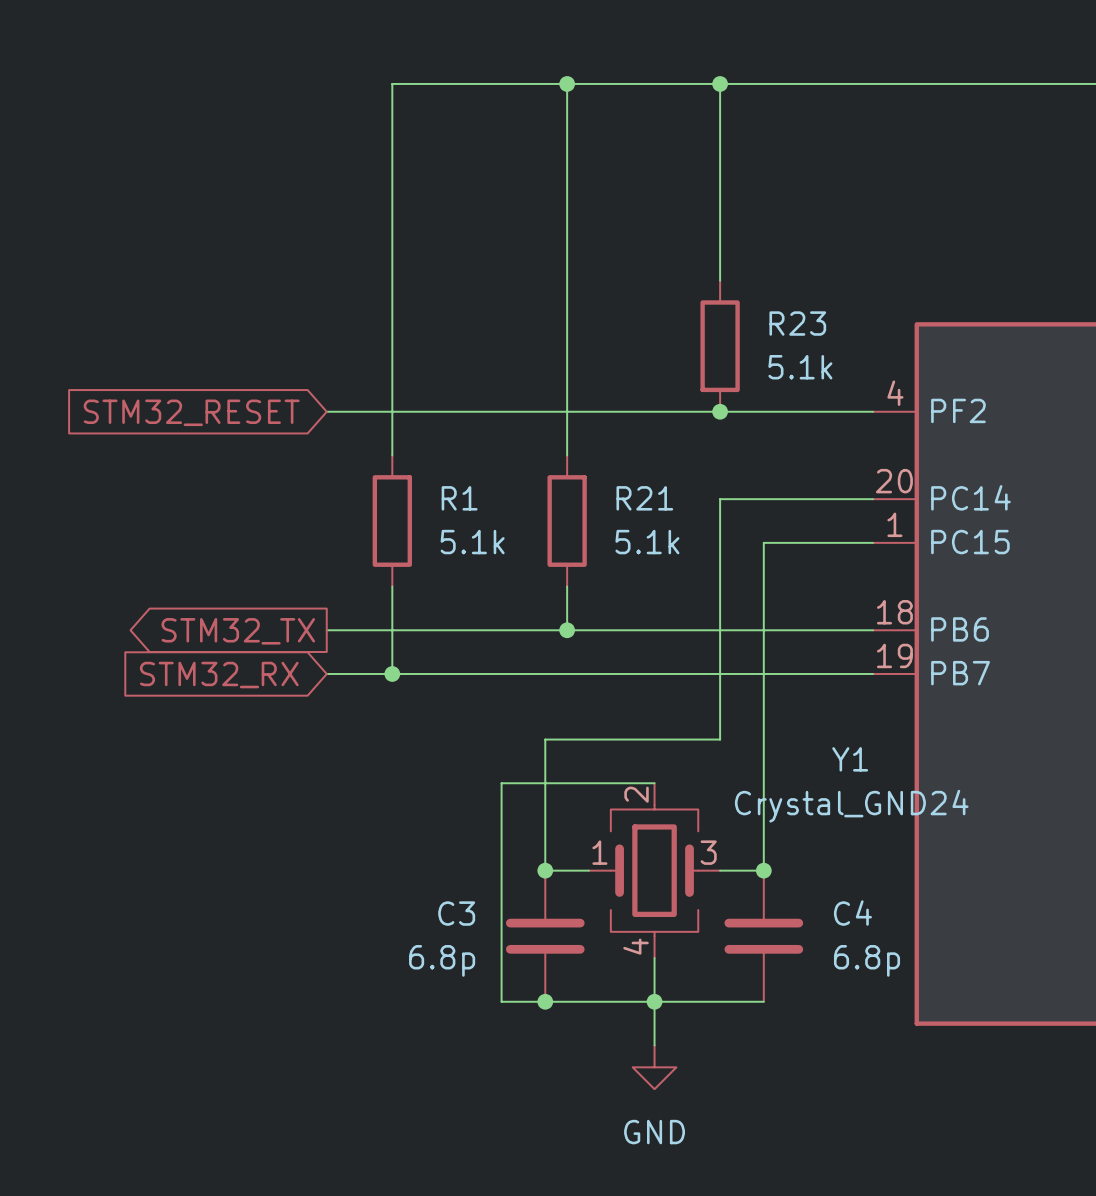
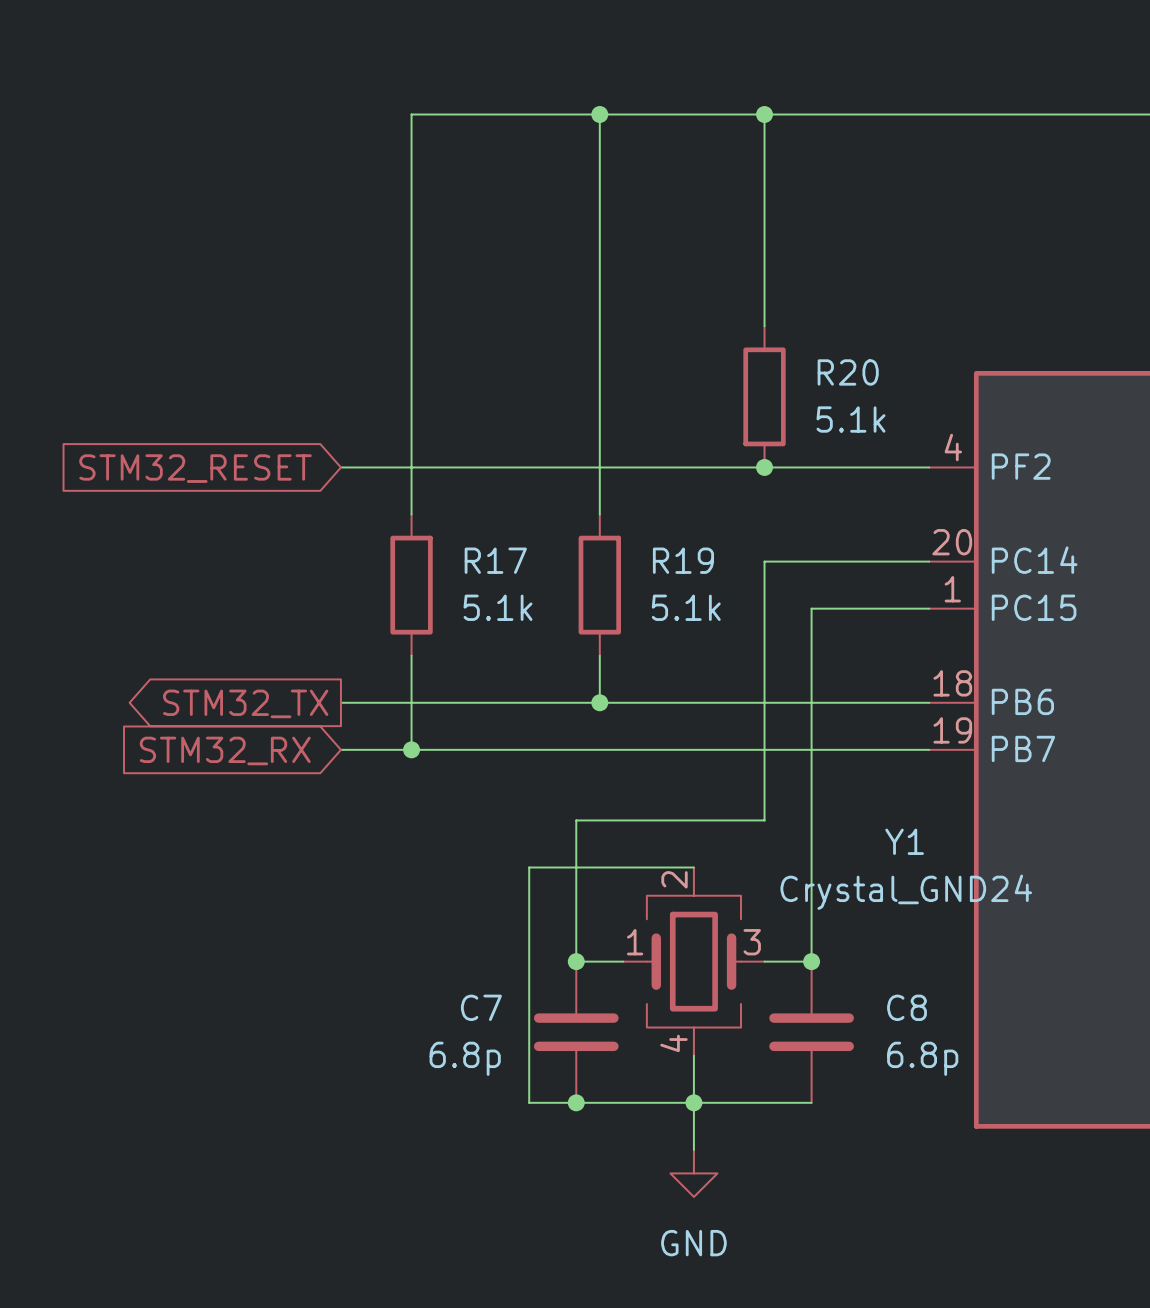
R23 name: R23 (797, 323) -> R20 (848, 372)
R1 name: R1 (459, 498) -> R17 (495, 560)
R21 name: R21 (644, 498) -> R19 (683, 560)
C3 name: C3 (456, 913) -> C7 (481, 1007)
C4 name: C4 (852, 913) -> C8 (907, 1007)

